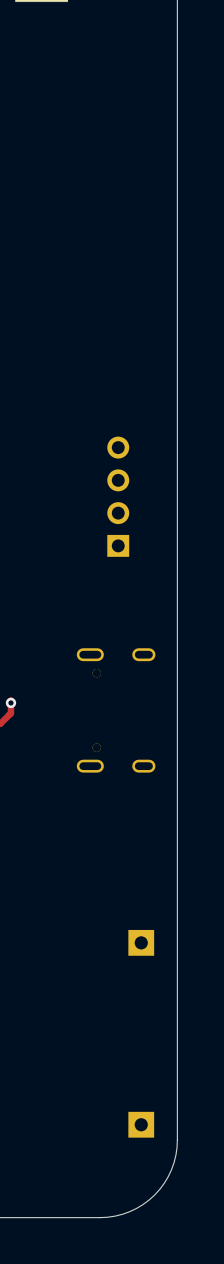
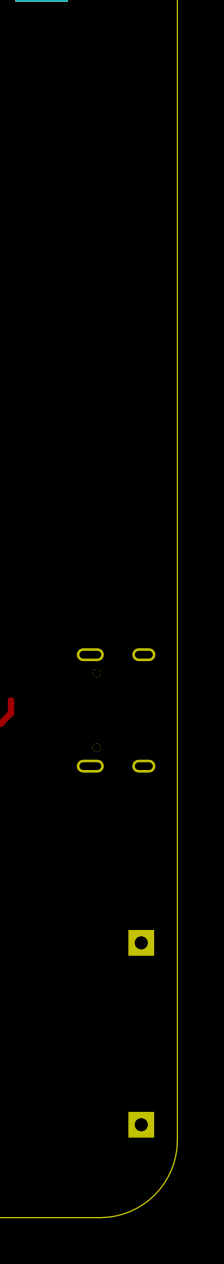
part: (118, 496) -> none
via: (10, 702) -> none

